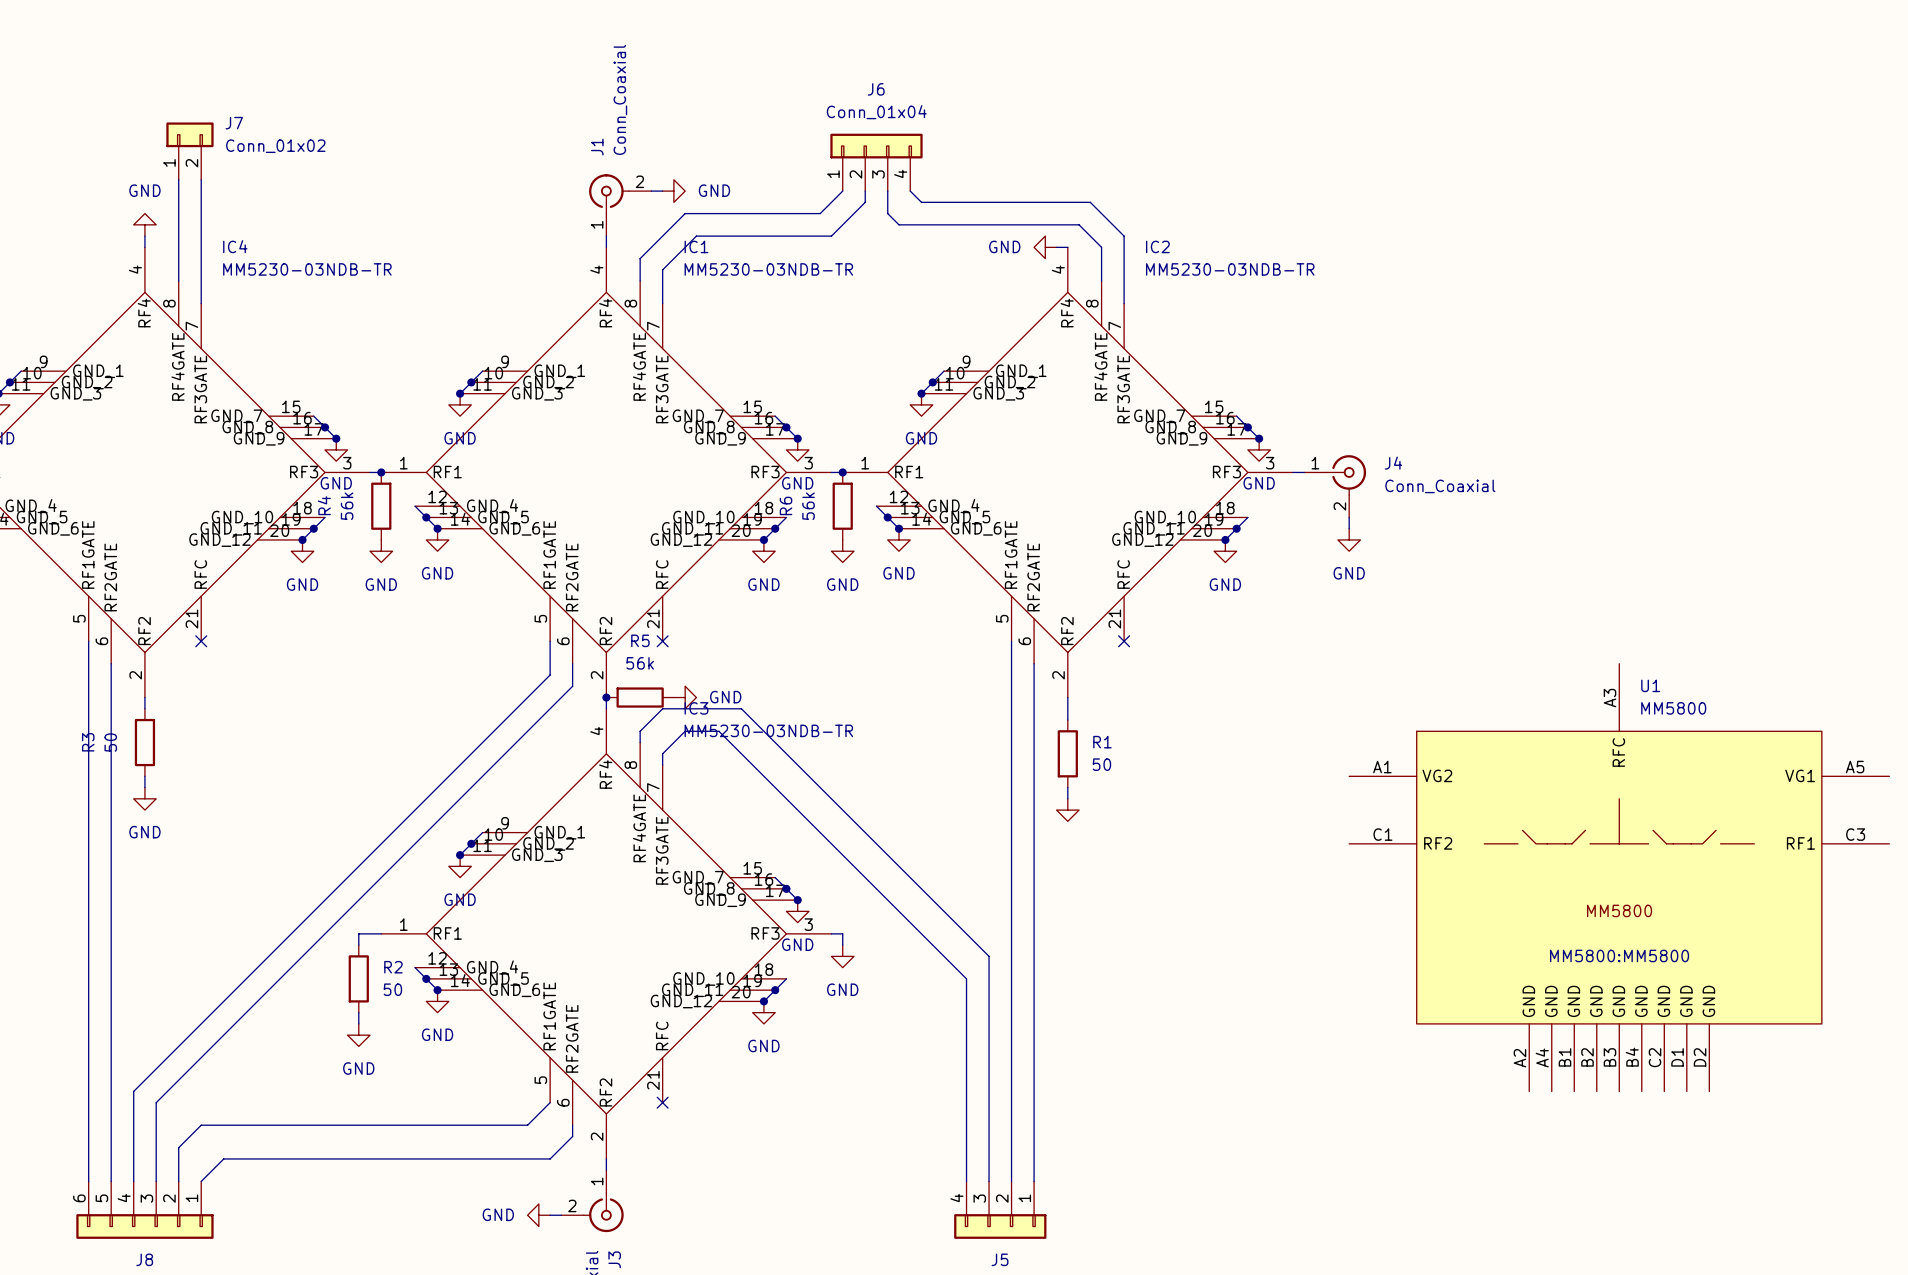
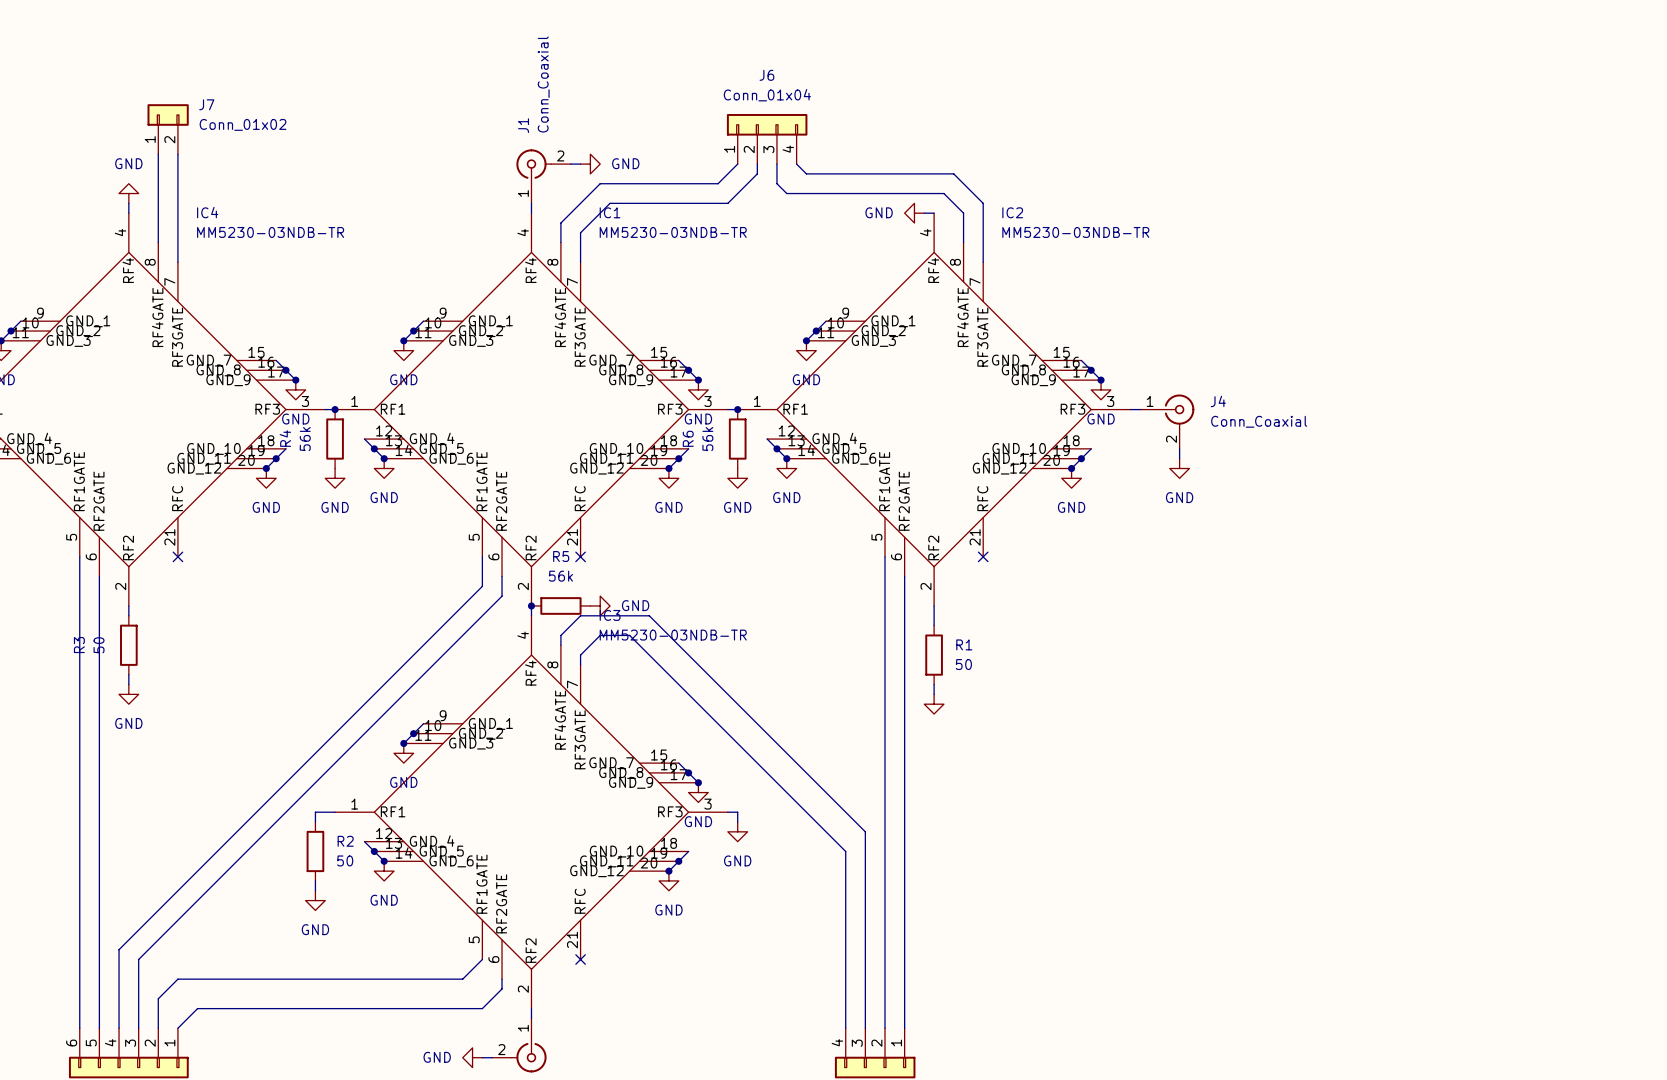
U1: MM5800 (1619, 877) -> none

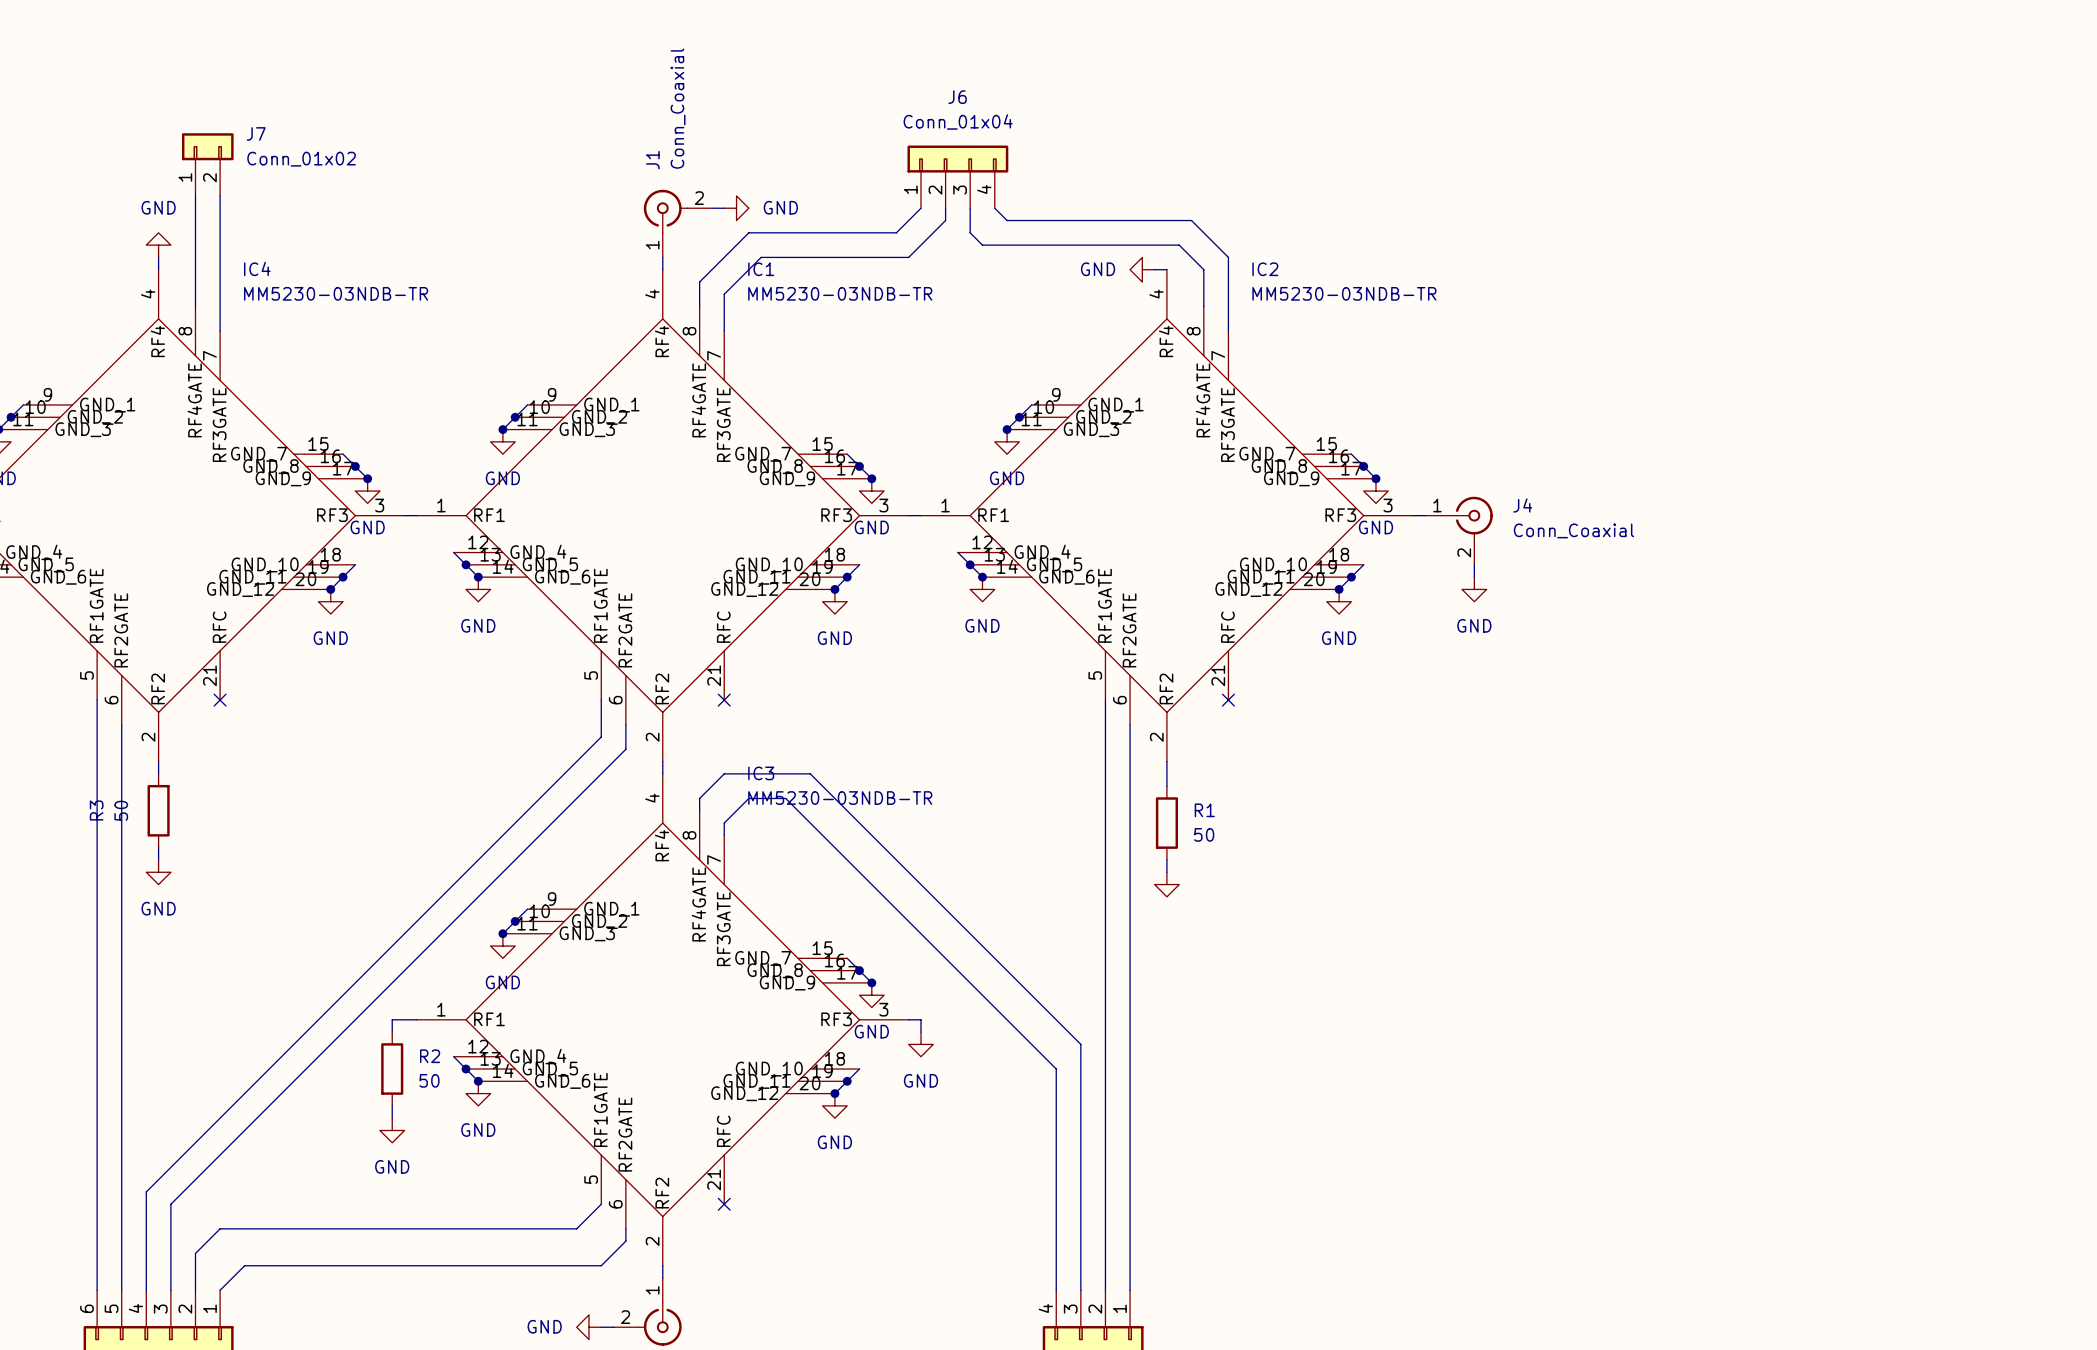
junction: (335, 409) -> none
junction: (737, 409) -> none
R4: 56k (335, 439) -> none
R6: 56k (737, 439) -> none
power symbol: GND (335, 478) -> none
power symbol: GND (737, 478) -> none
junction: (531, 605) -> none
R5: 56k (560, 605) -> none
power symbol: GND (600, 605) -> none

